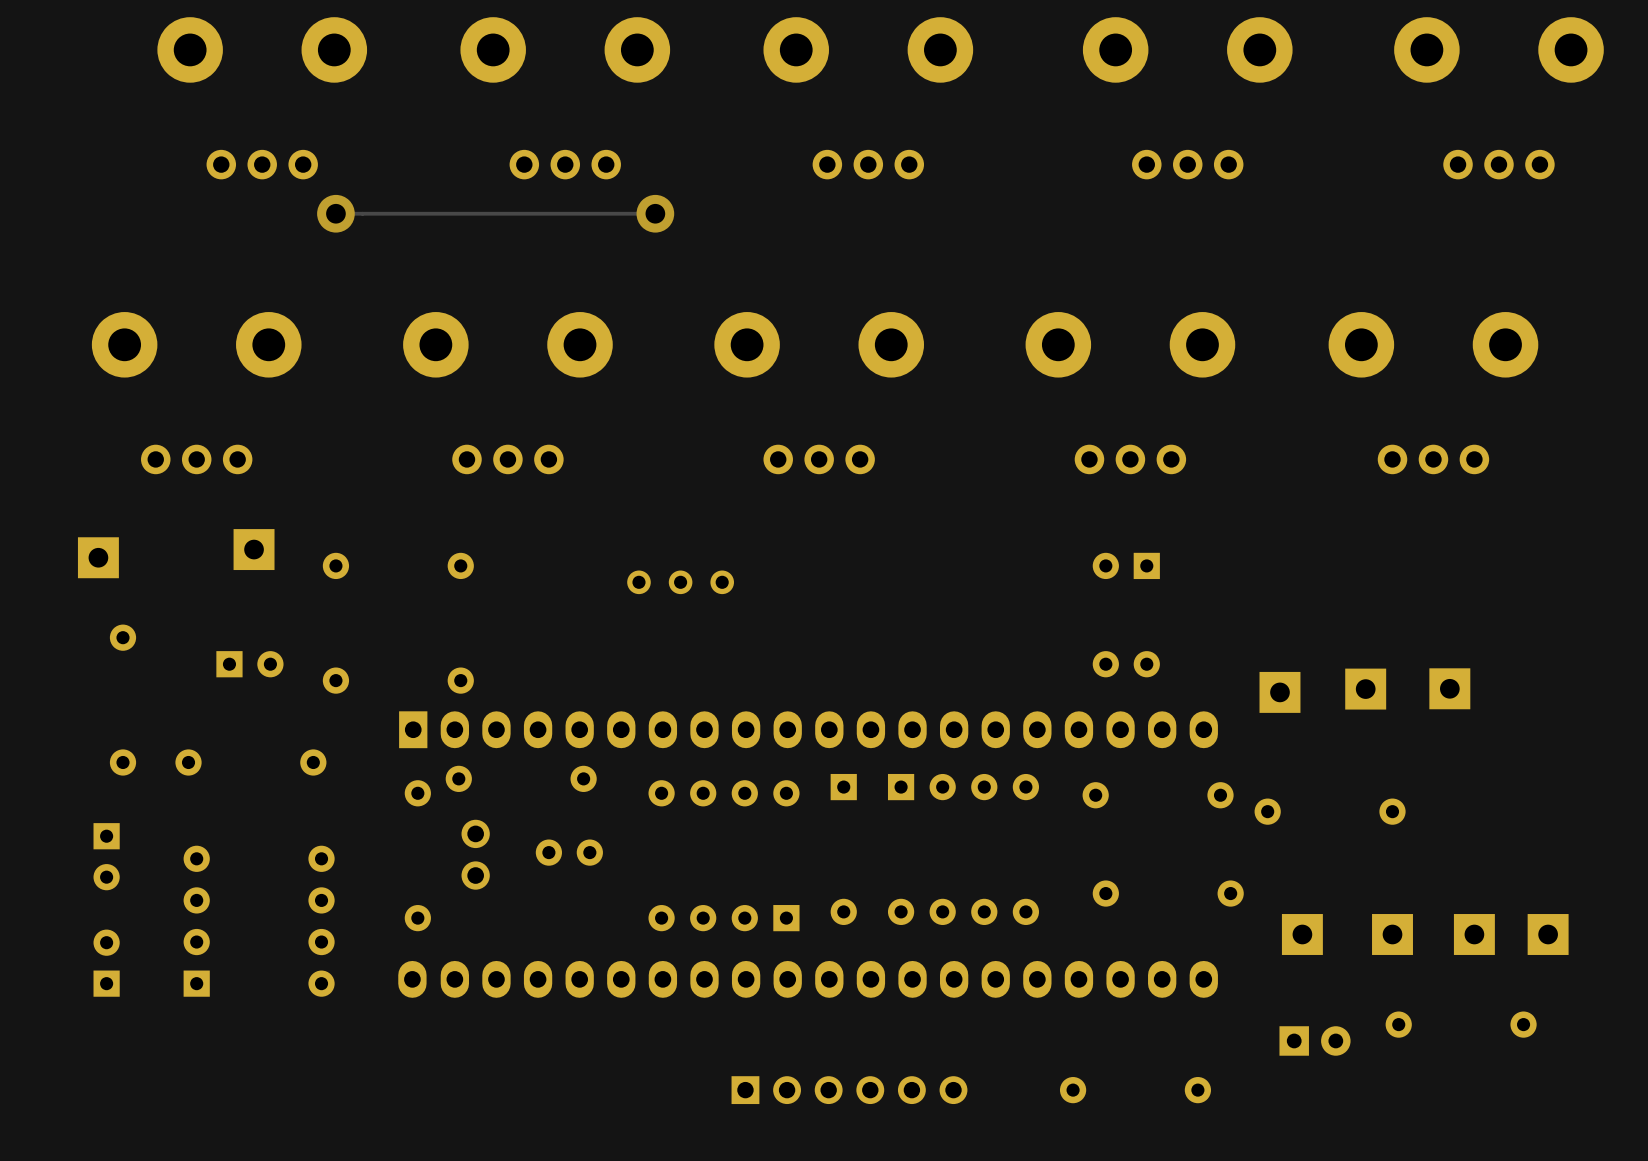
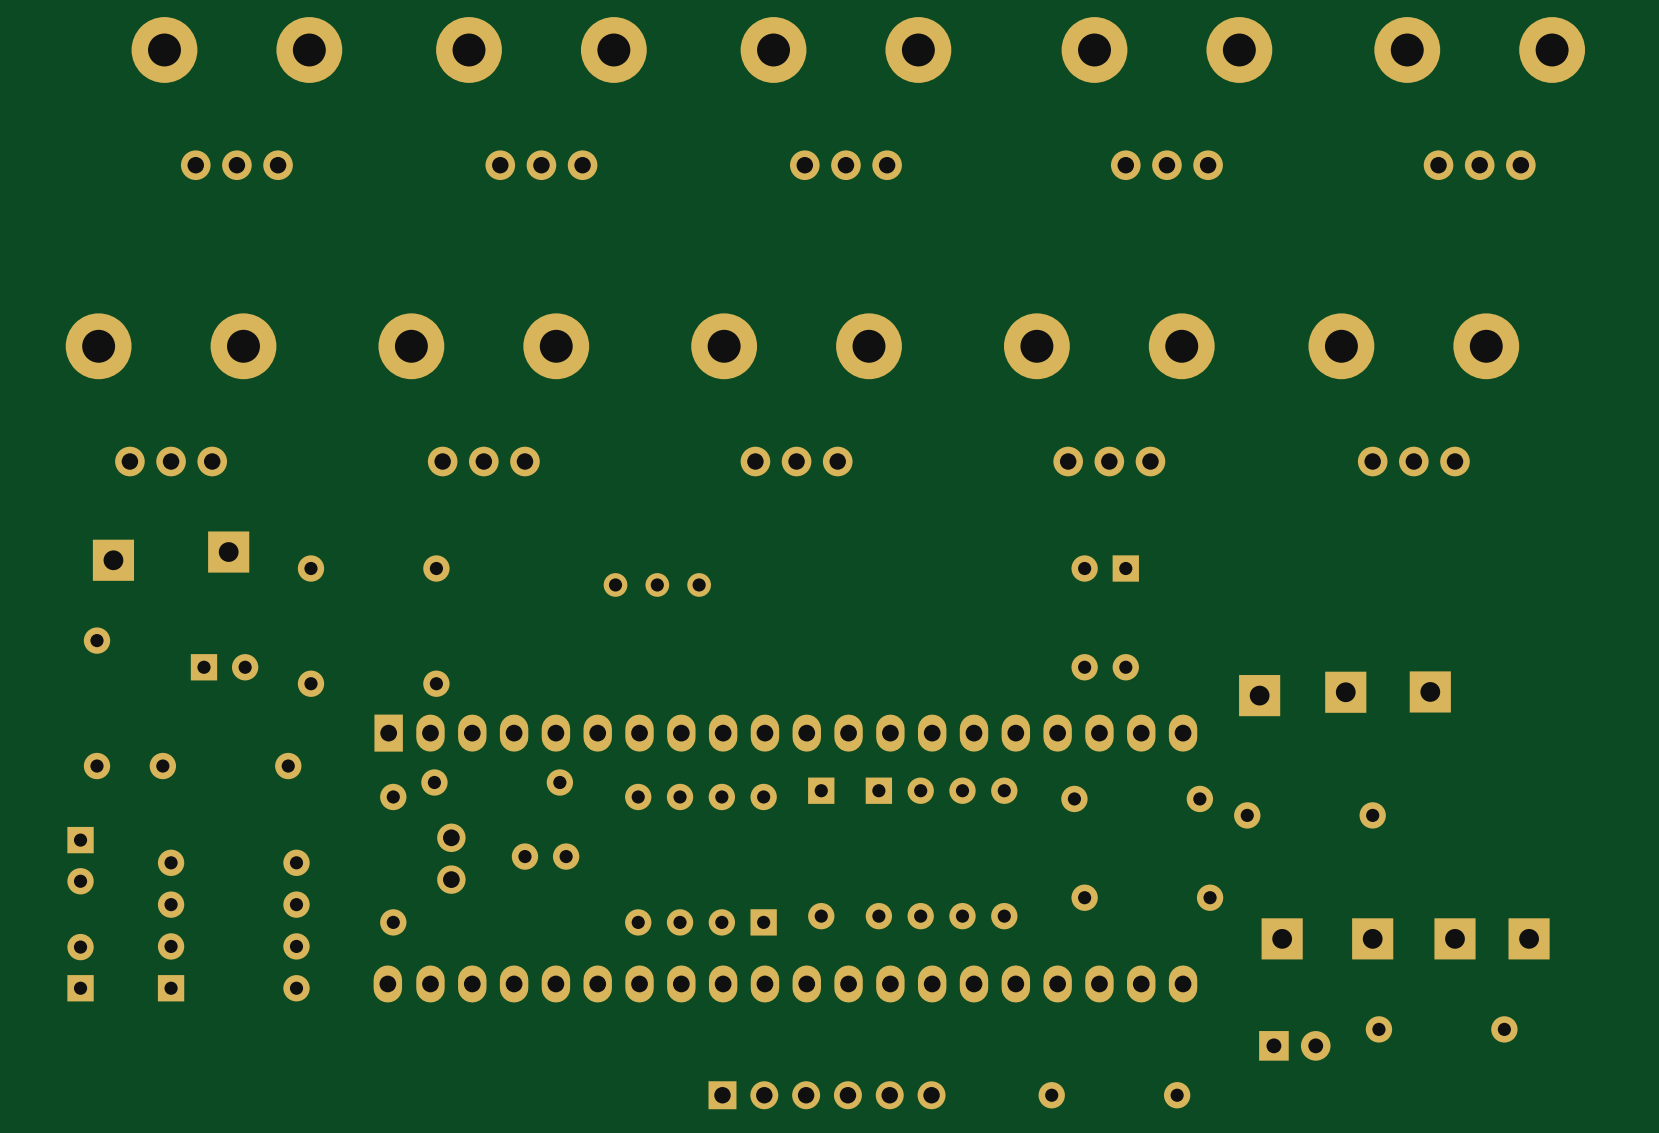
via: (335, 213) -> none
track: (655, 213) (335, 213) -> none
via: (655, 213) -> none
part position: (98, 557) -> (113, 560)

